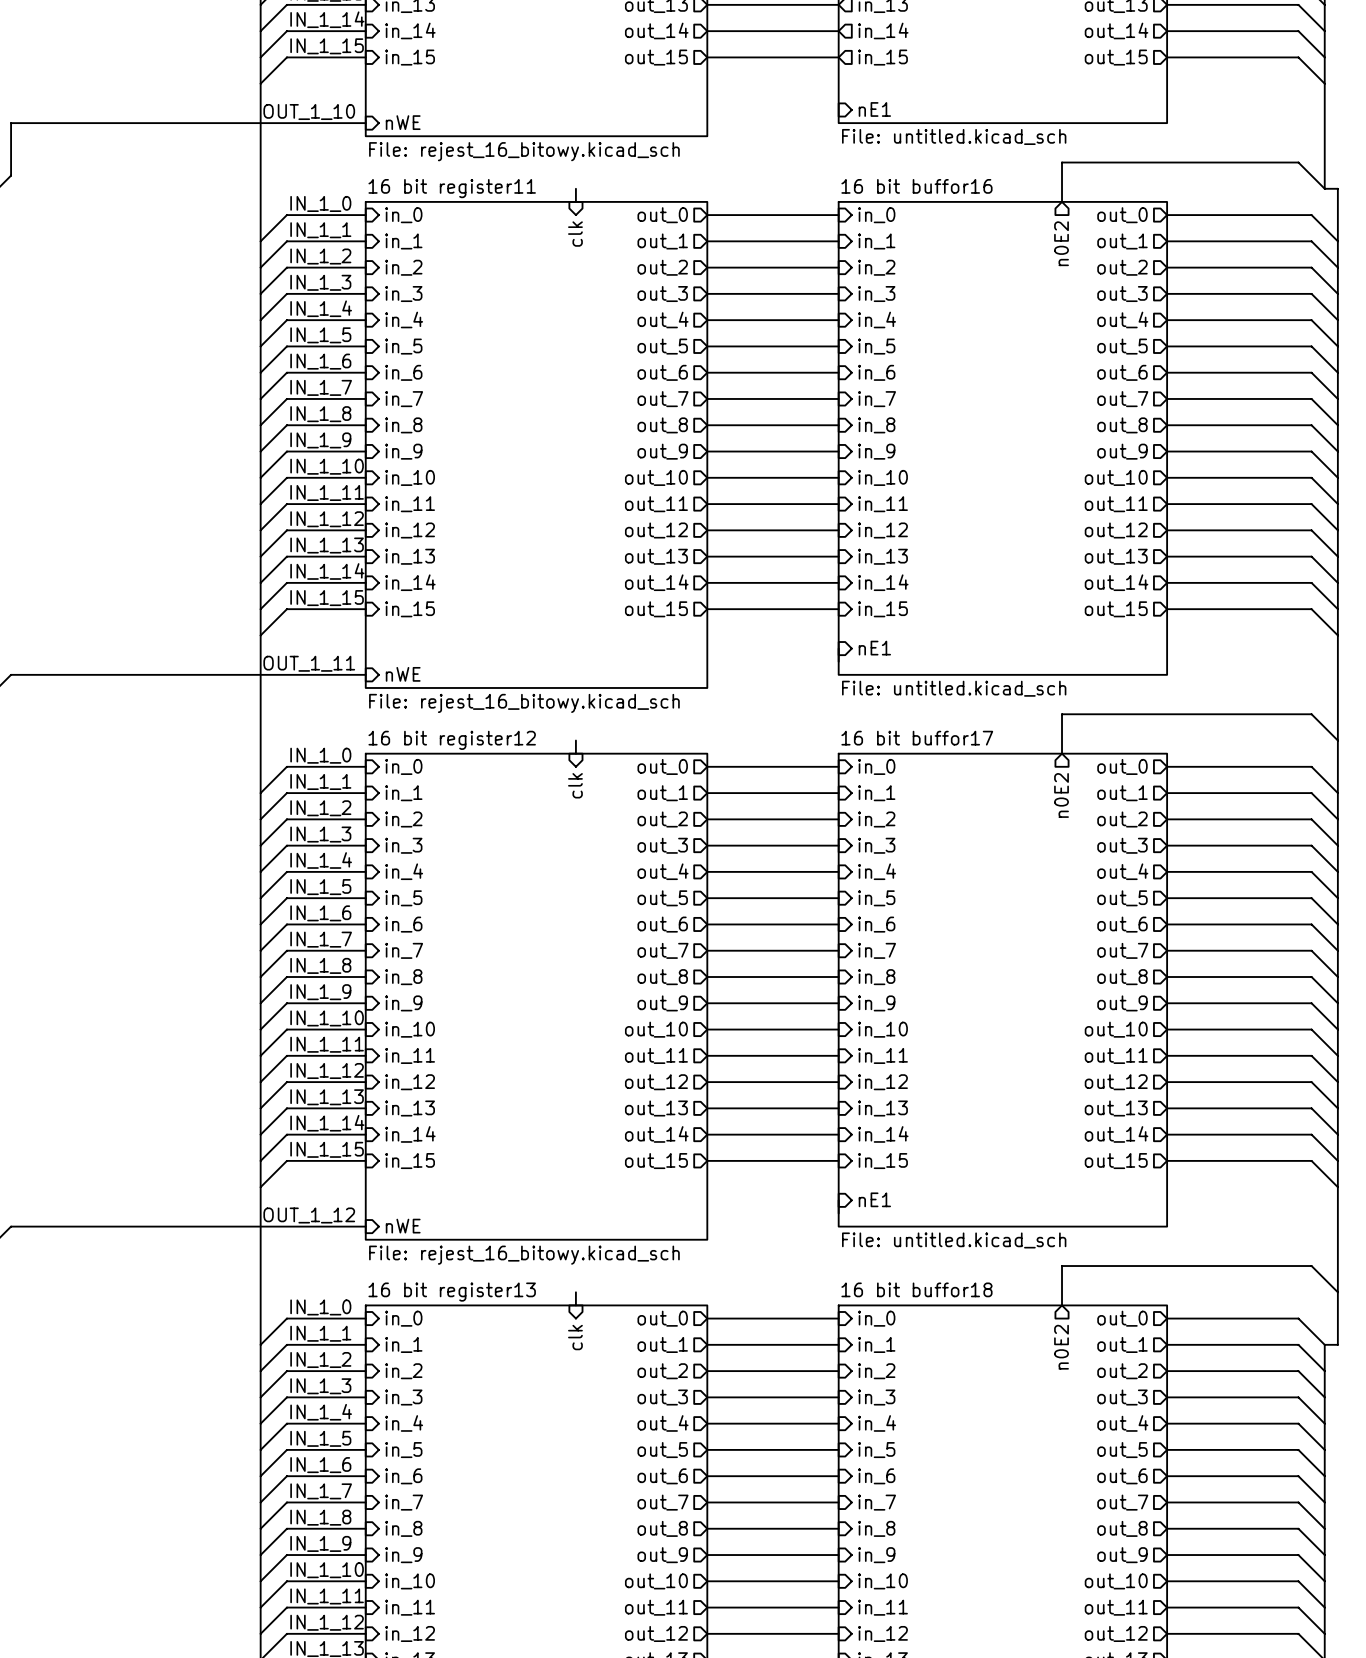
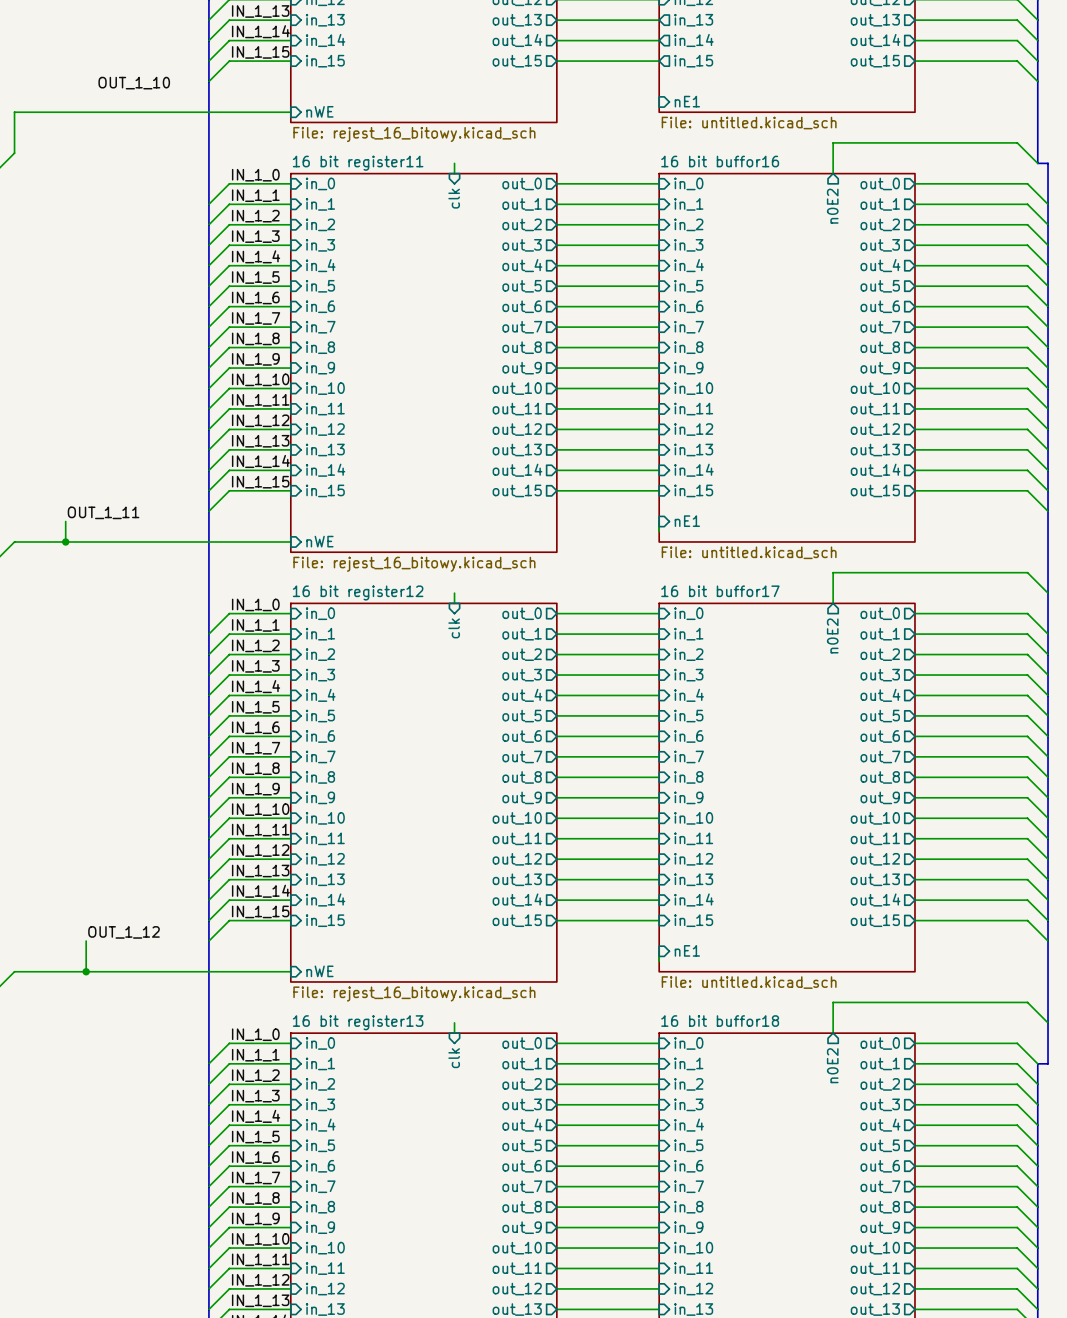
label position: OUT_1_10 (309, 112) -> OUT_1_10 (134, 83)
wire: none -> (65, 521) (65, 541)
label position: OUT_1_11 (309, 663) -> OUT_1_11 (103, 512)
junction: none -> (65, 541)
wire: none -> (86, 941) (86, 971)
label position: OUT_1_12 (309, 1215) -> OUT_1_12 (124, 932)
junction: none -> (86, 971)

